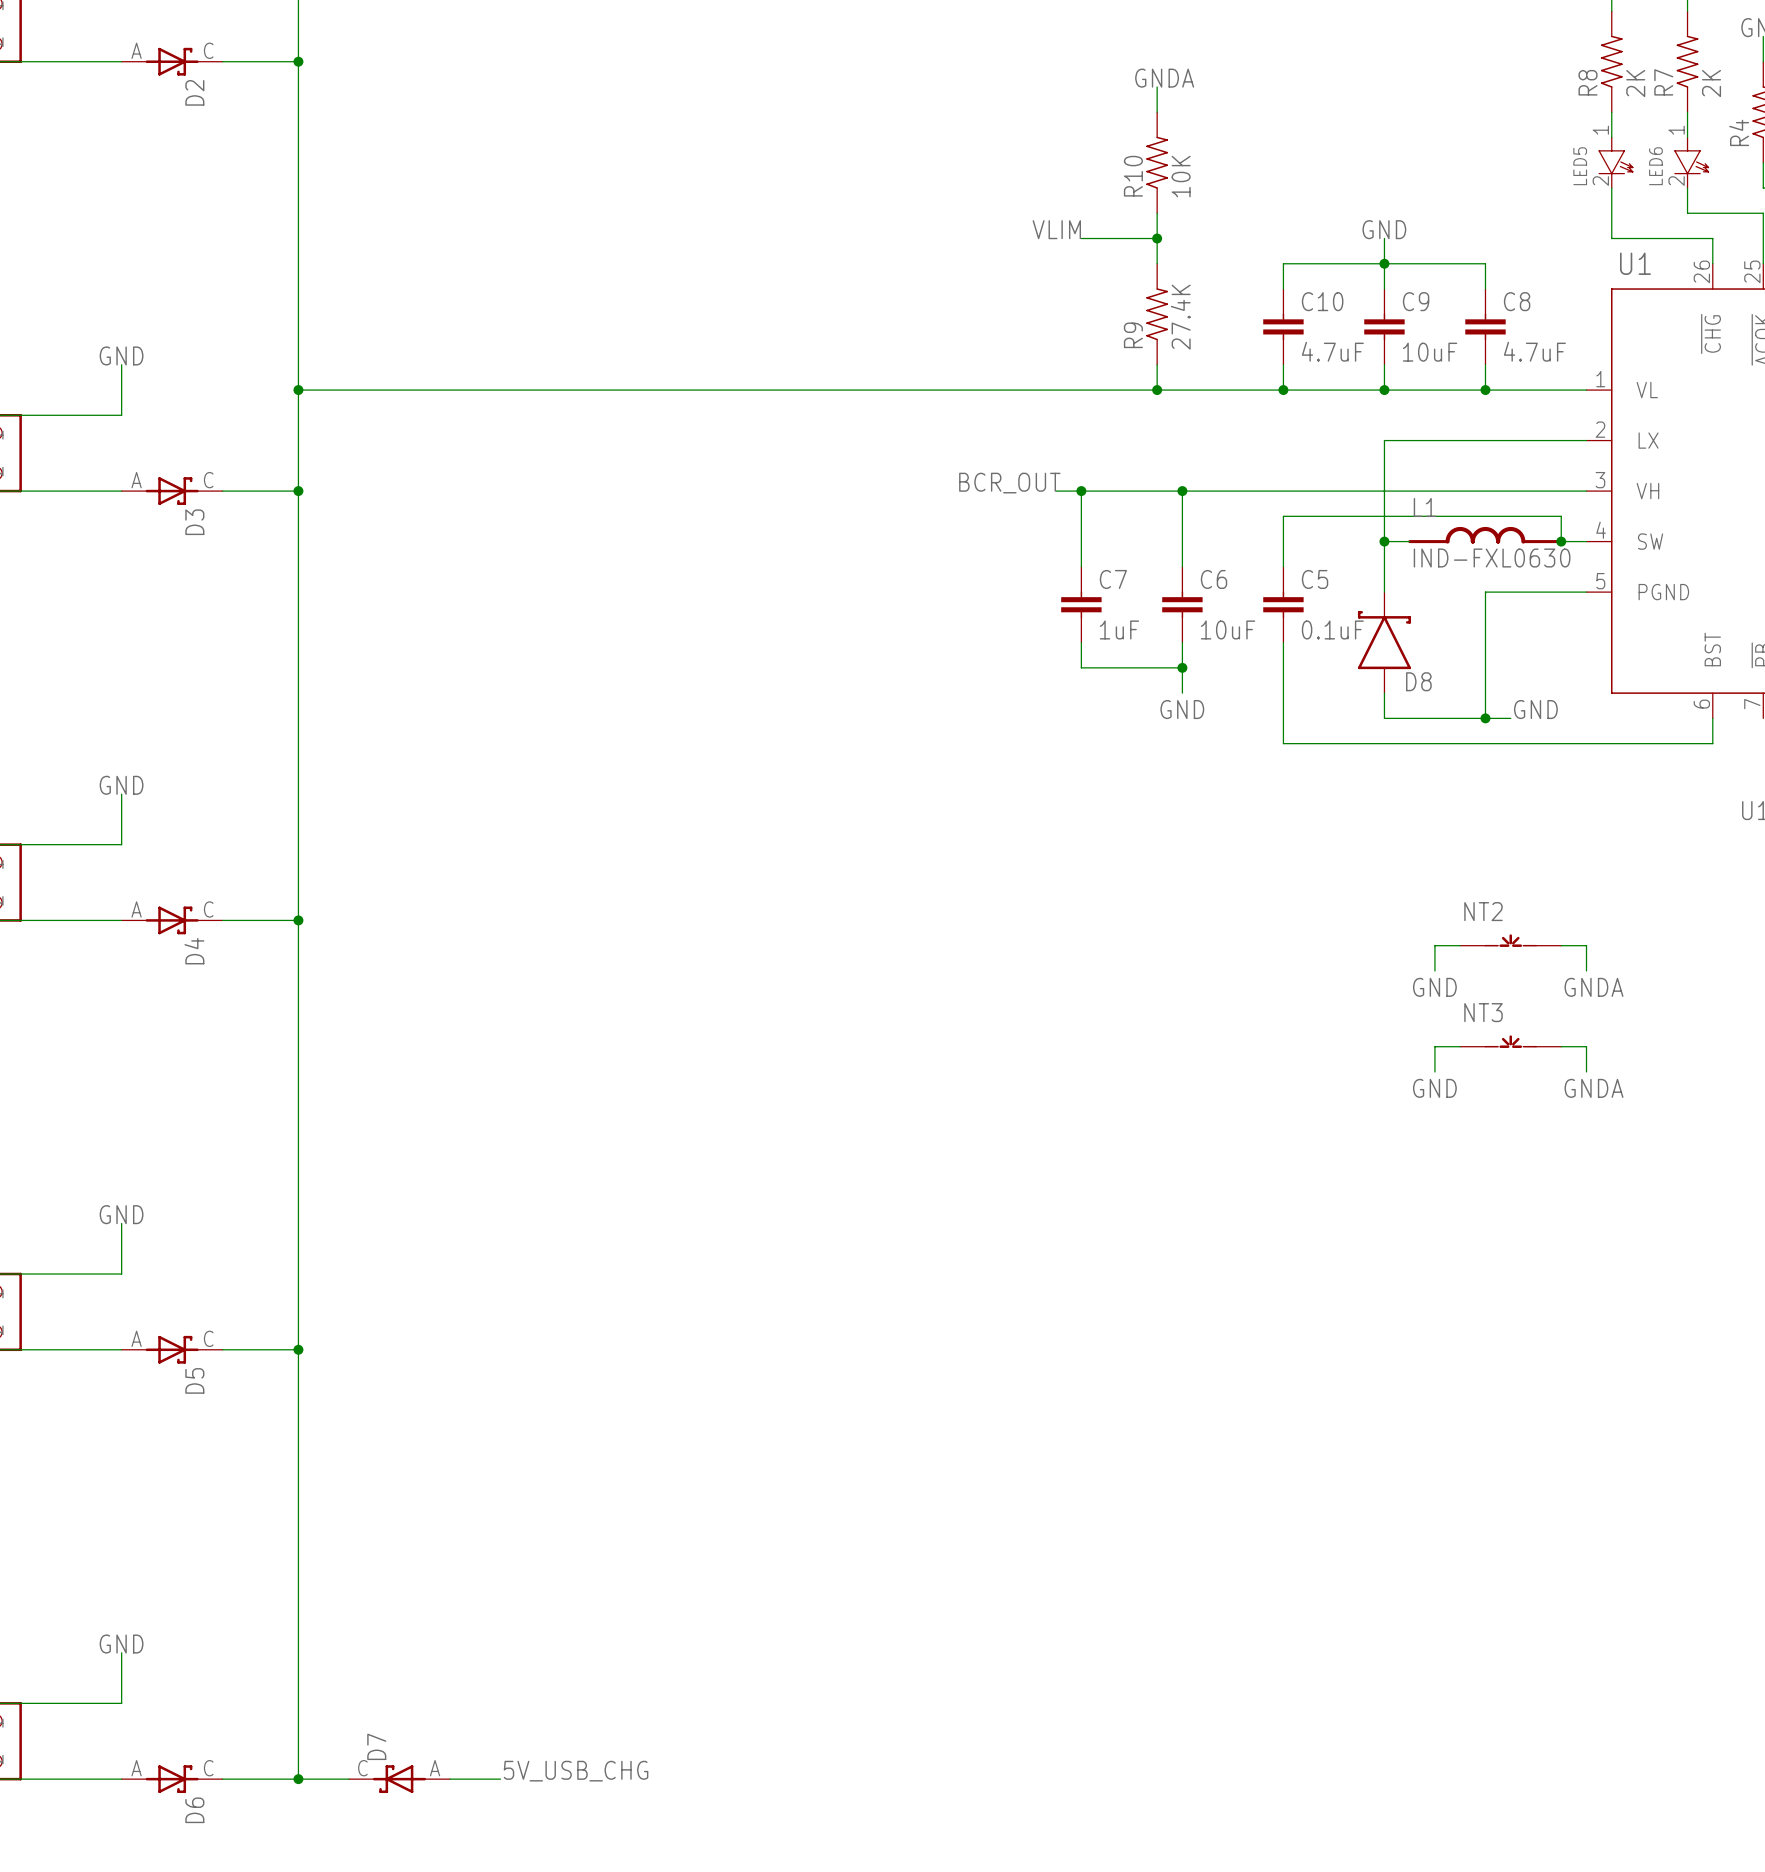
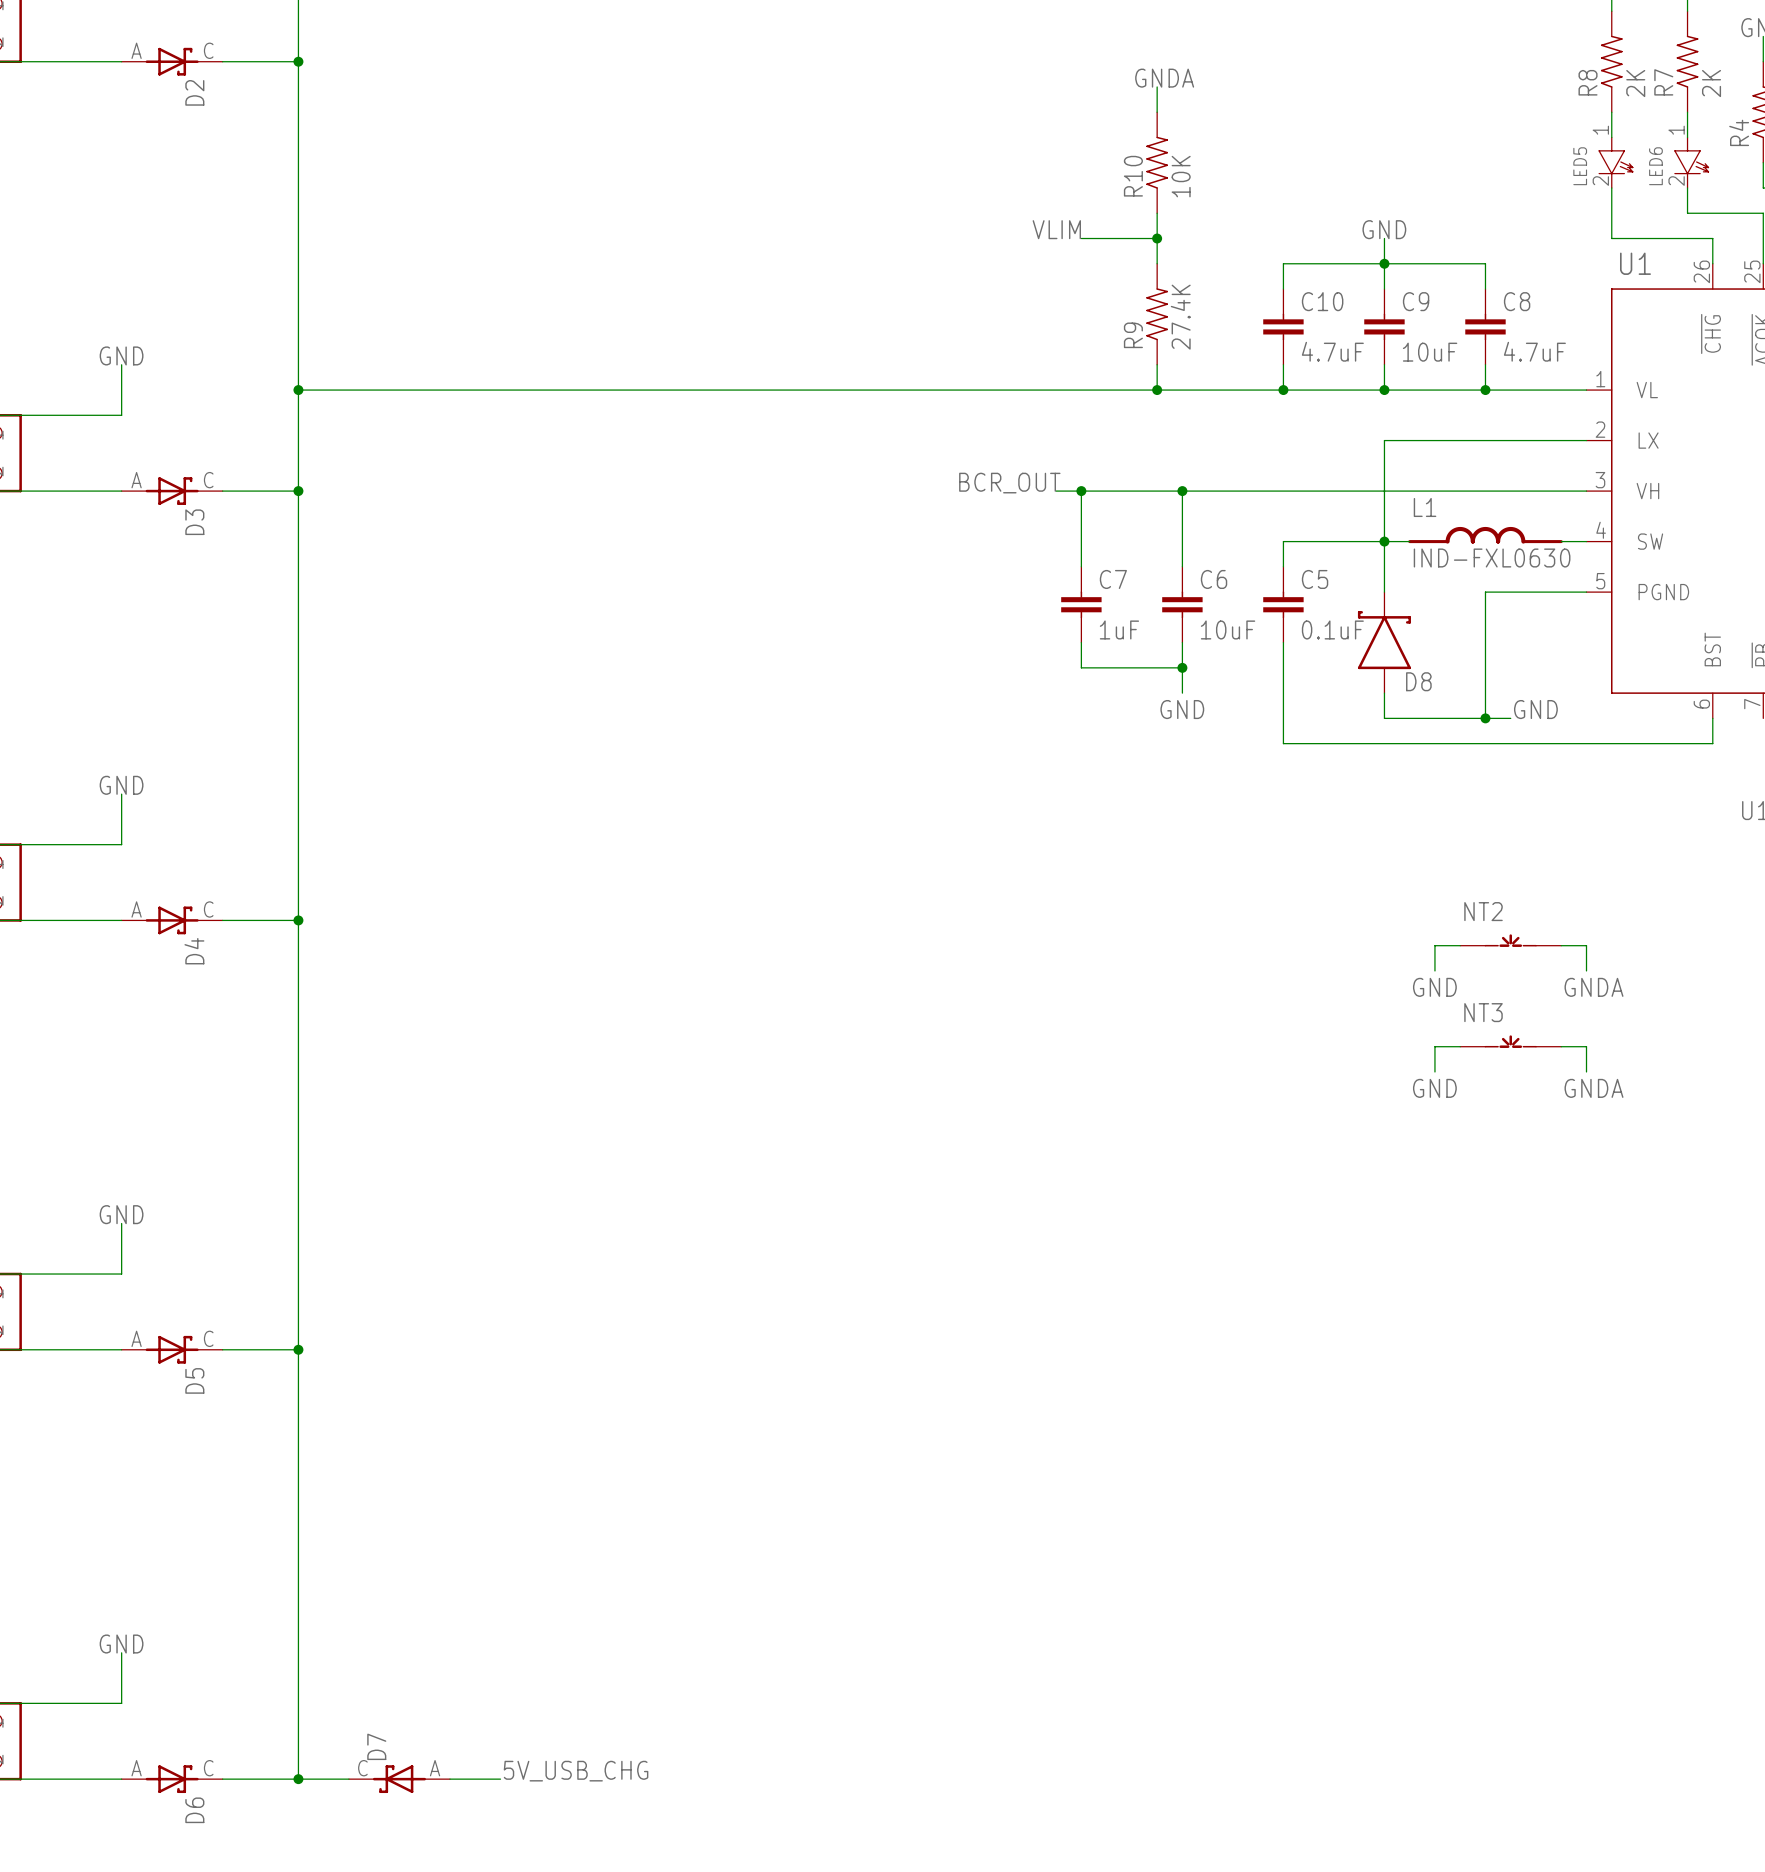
wire: (1283, 541) (1283, 516) (1561, 516) (1561, 541) -> (1283, 541) (1384, 541)
junction: (1561, 541) -> none

